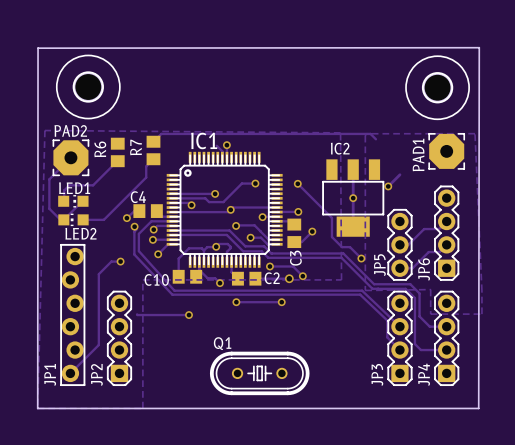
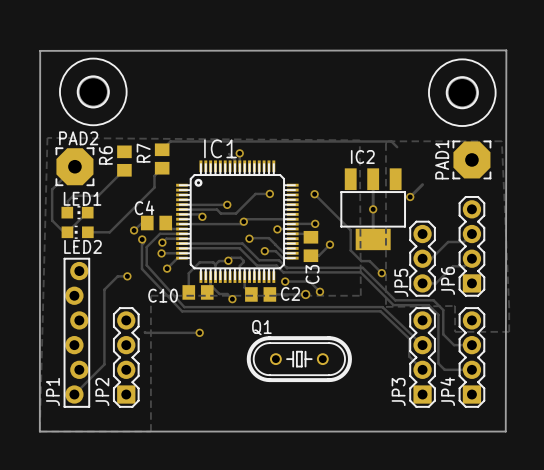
track: (236, 302) (281, 302) -> none
via: (236, 302) -> none
via: (281, 302) -> none
Q1 position: (259, 373) -> (299, 359)

